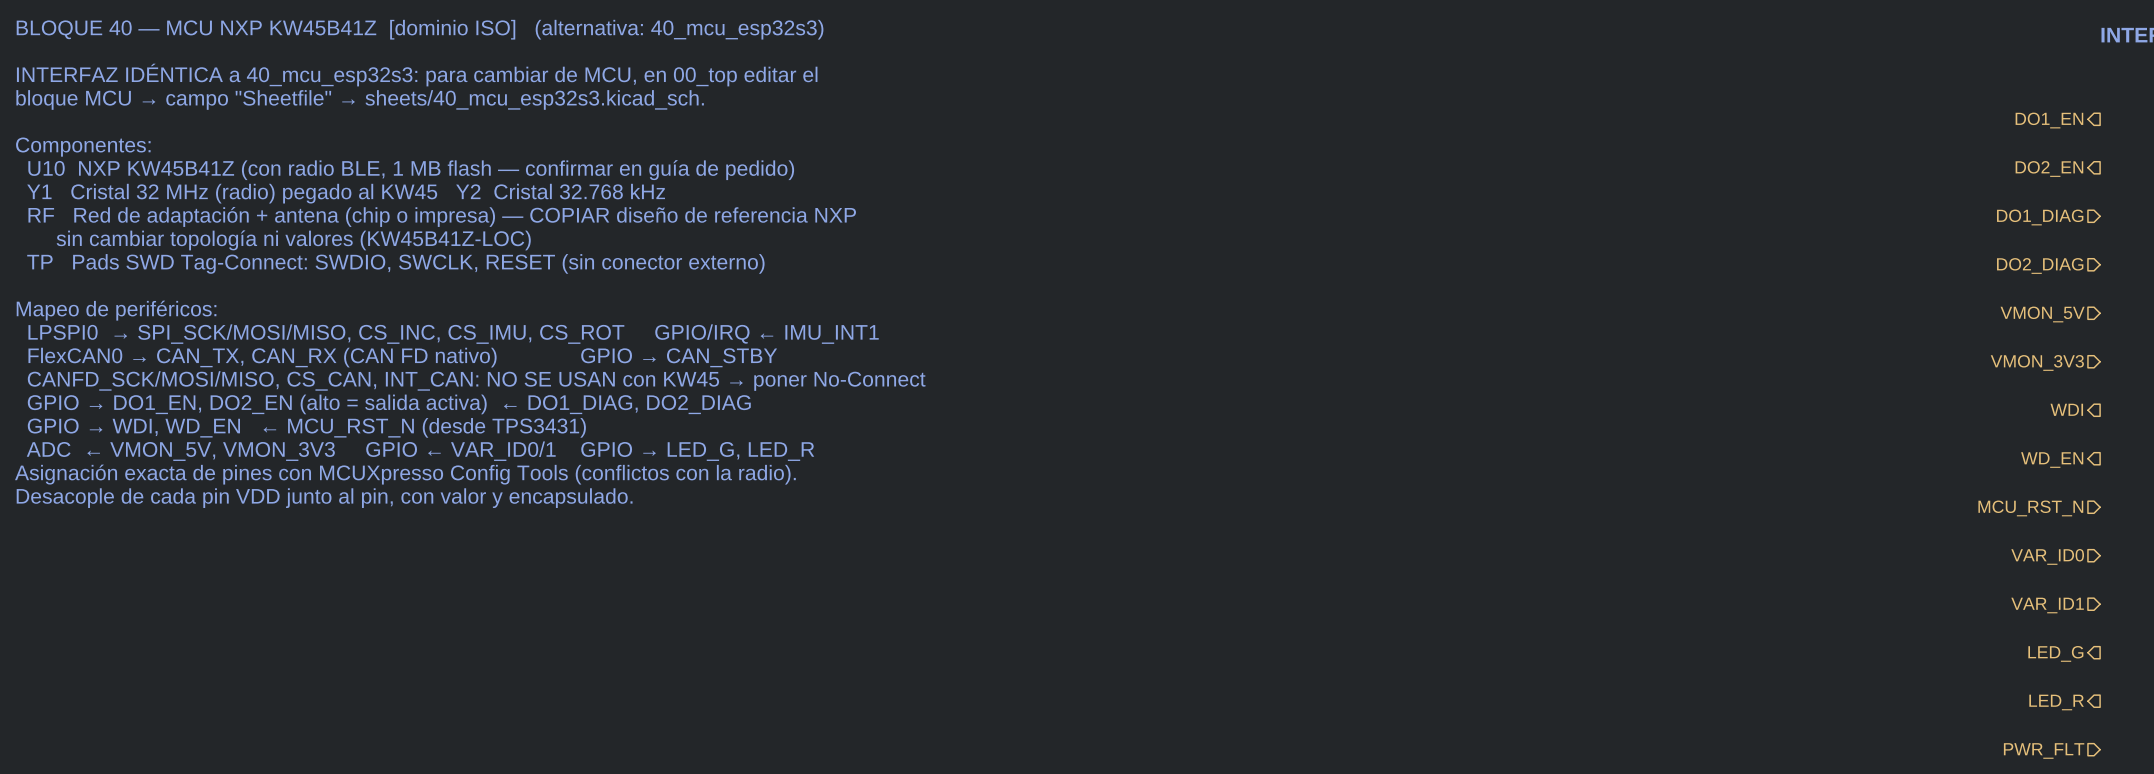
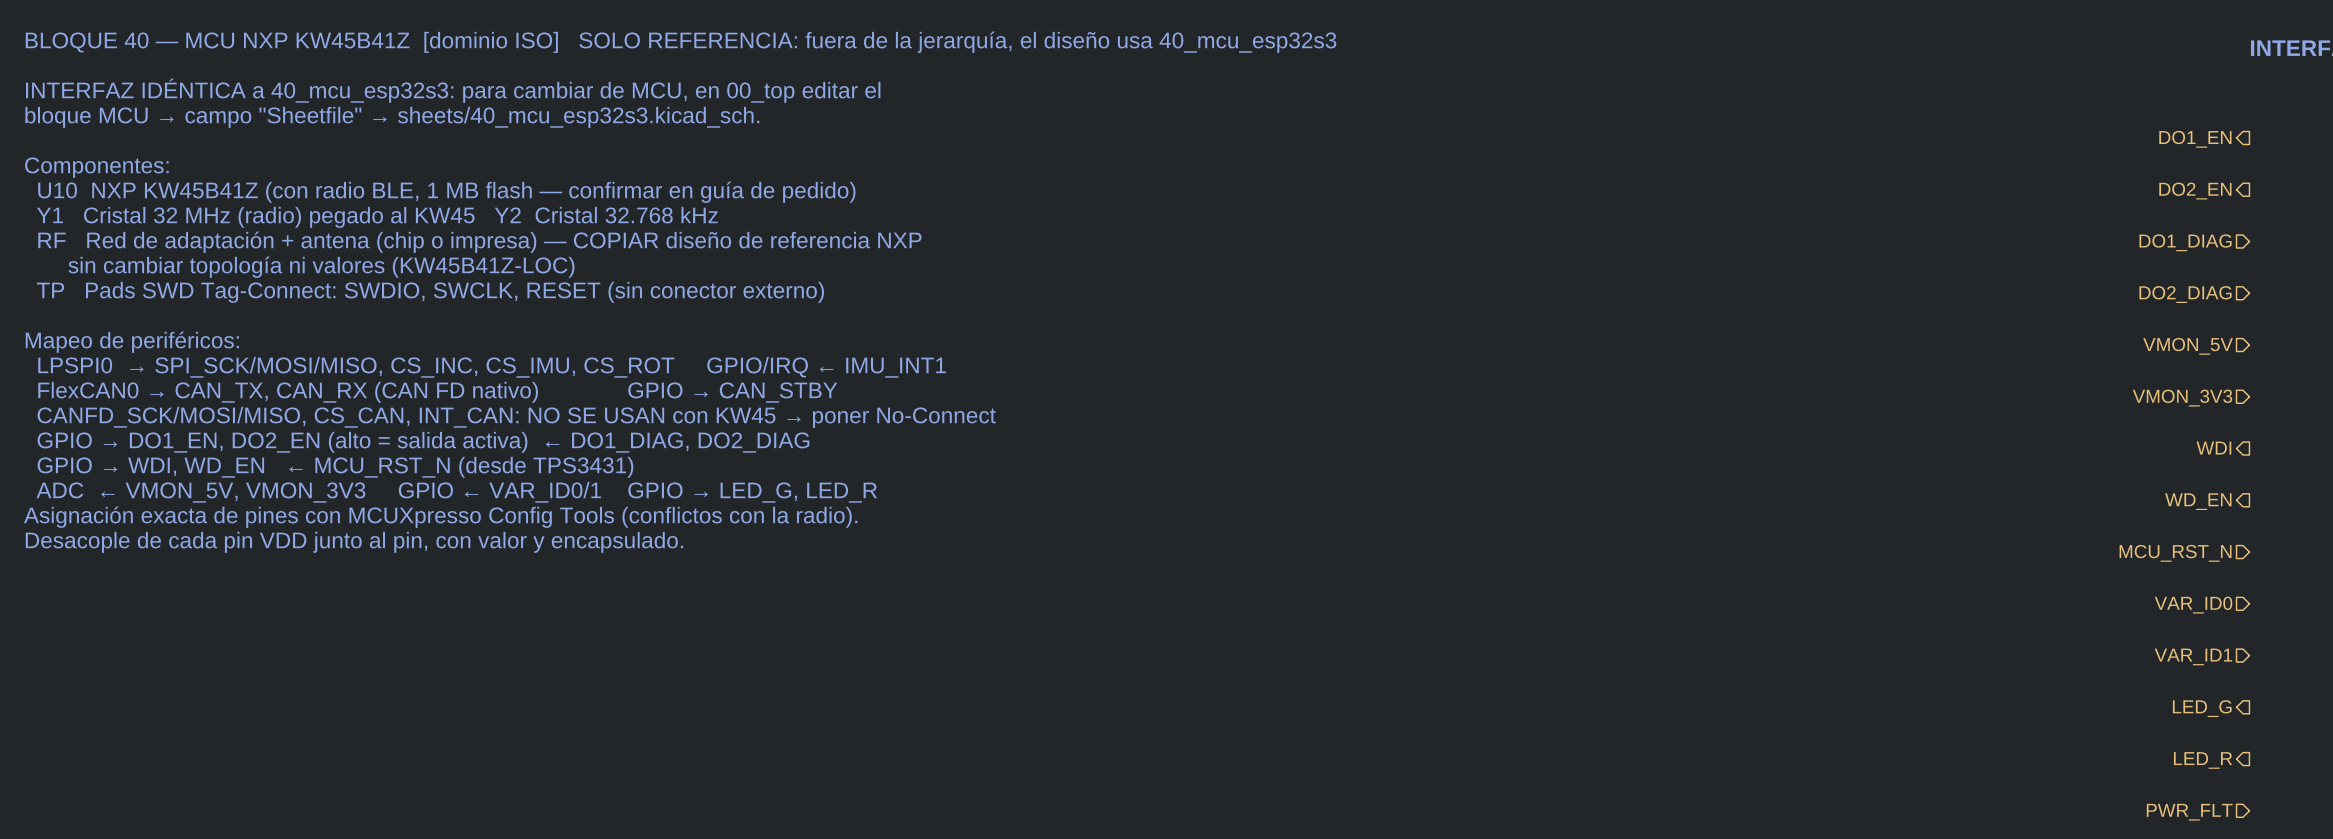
text: BLOQUE 40 — MCU NXP KW45B41Z [dominio ISO] (alternativa: 40_mcu_esp32s3) (420, 29) -> BLOQUE 40 — MCU NXP KW45B41Z [dominio ISO] SOLO REFERENCIA: fuera de la jerarquía, el diseño usa 40_mcu_esp32s3 (681, 42)

